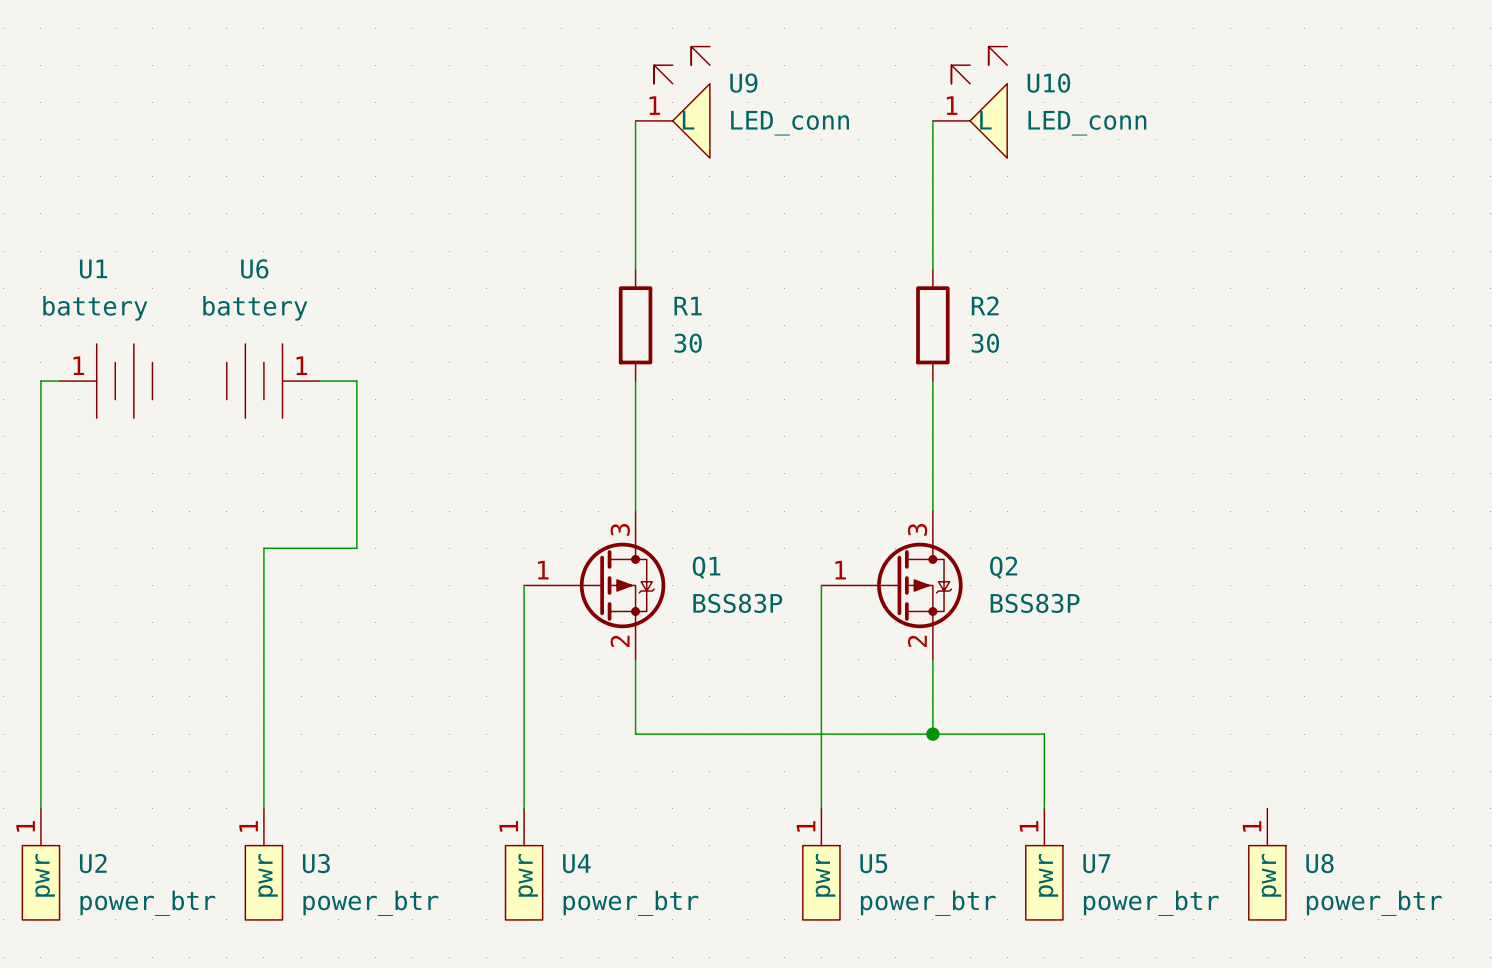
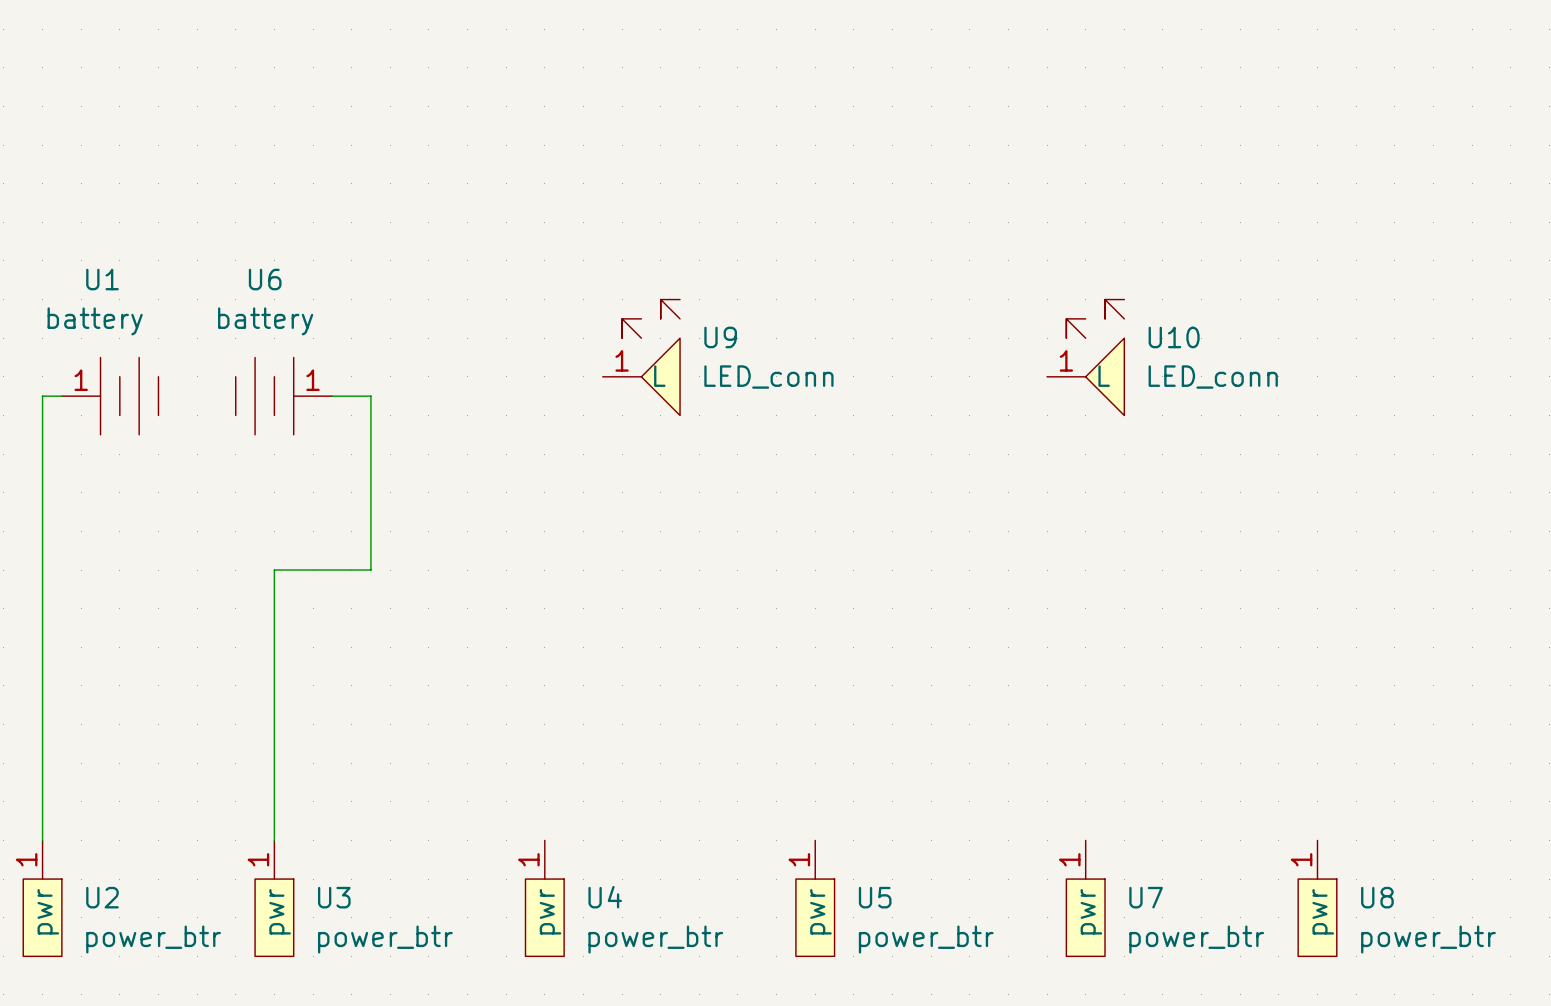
U9 position: (672, 102) -> (641, 357)
U10 position: (970, 102) -> (1085, 357)
wire: (635, 120) (635, 269) -> none
wire: (932, 120) (932, 269) -> none
R1: 30 (635, 325) -> none
R2: 30 (932, 325) -> none
wire: (635, 381) (635, 511) -> none
wire: (932, 381) (932, 511) -> none
wire: (524, 585) (524, 808) -> none
Q1: BSS83P (594, 585) -> none
wire: (821, 585) (821, 808) -> none
Q2: BSS83P (891, 585) -> none
wire: (635, 659) (635, 734) (1044, 734) (1044, 808) -> none
wire: (932, 659) (932, 734) -> none
junction: (932, 734) -> none
U5 position: (821, 864) -> (815, 898)

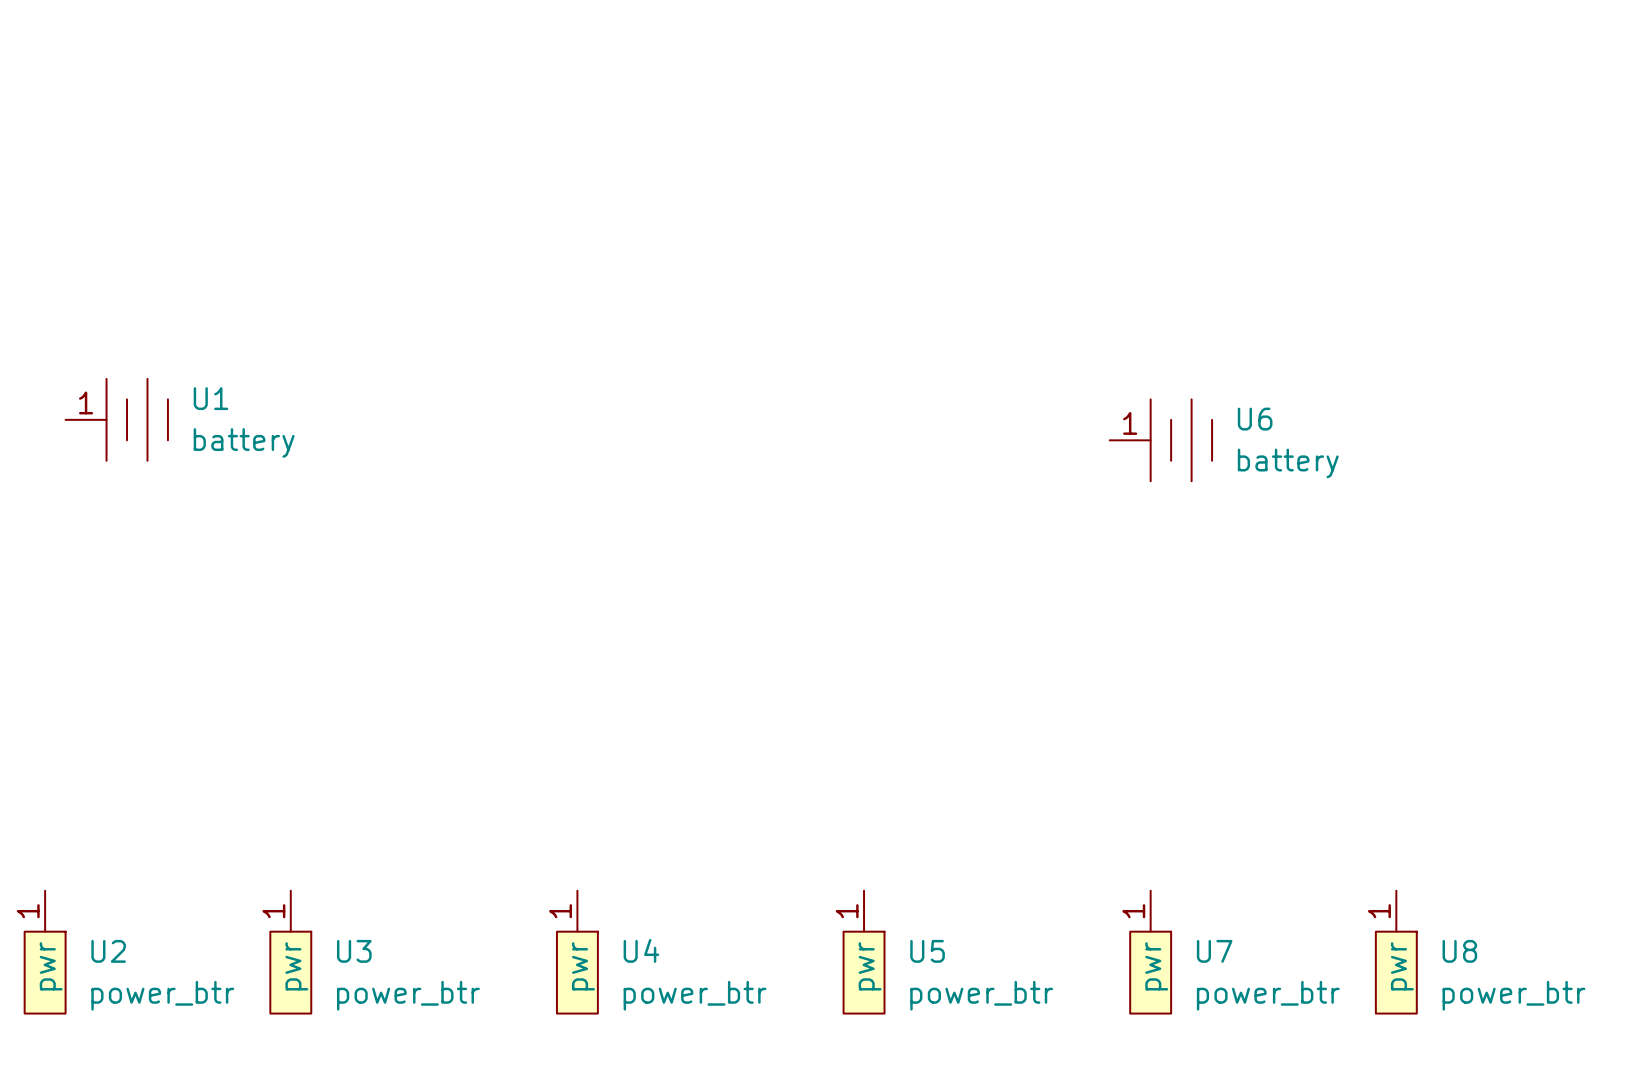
U1 name position: U1 (102, 279) -> U1 (211, 398)
U6 name position: U6 (265, 279) -> U6 (1255, 419)
U1 value position: battery (95, 321) -> battery (244, 442)
U6 value position: battery (265, 321) -> battery (1288, 463)
U9: LED_conn (641, 357) -> none
U10: LED_conn (1085, 357) -> none
wire: (61, 396) (42, 396) (42, 840) -> none
U6 rotation: 0° (264, 396) -> 180° (1181, 440)
U6 position: (284, 396) -> (1160, 440)
wire: (332, 396) (370, 396) (370, 570) (274, 570) (274, 840) -> none

